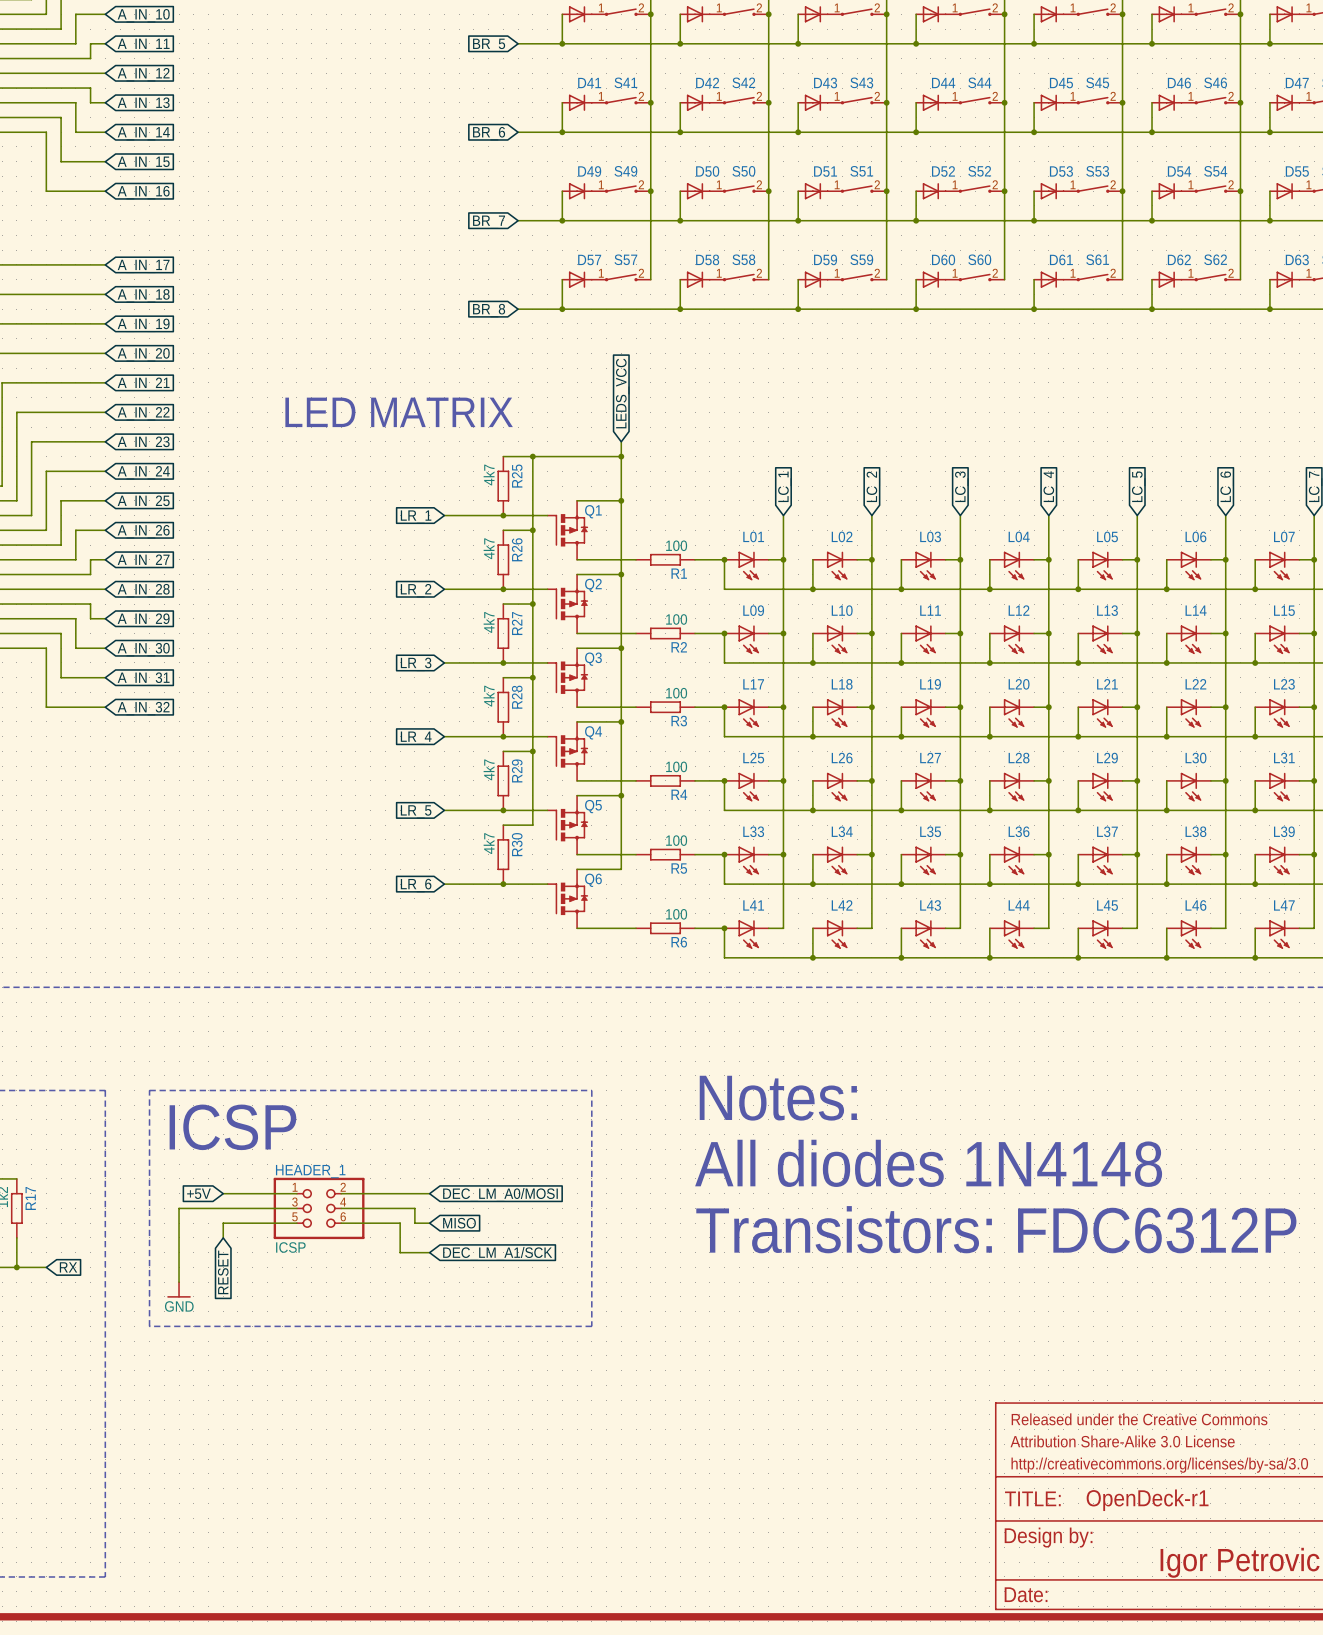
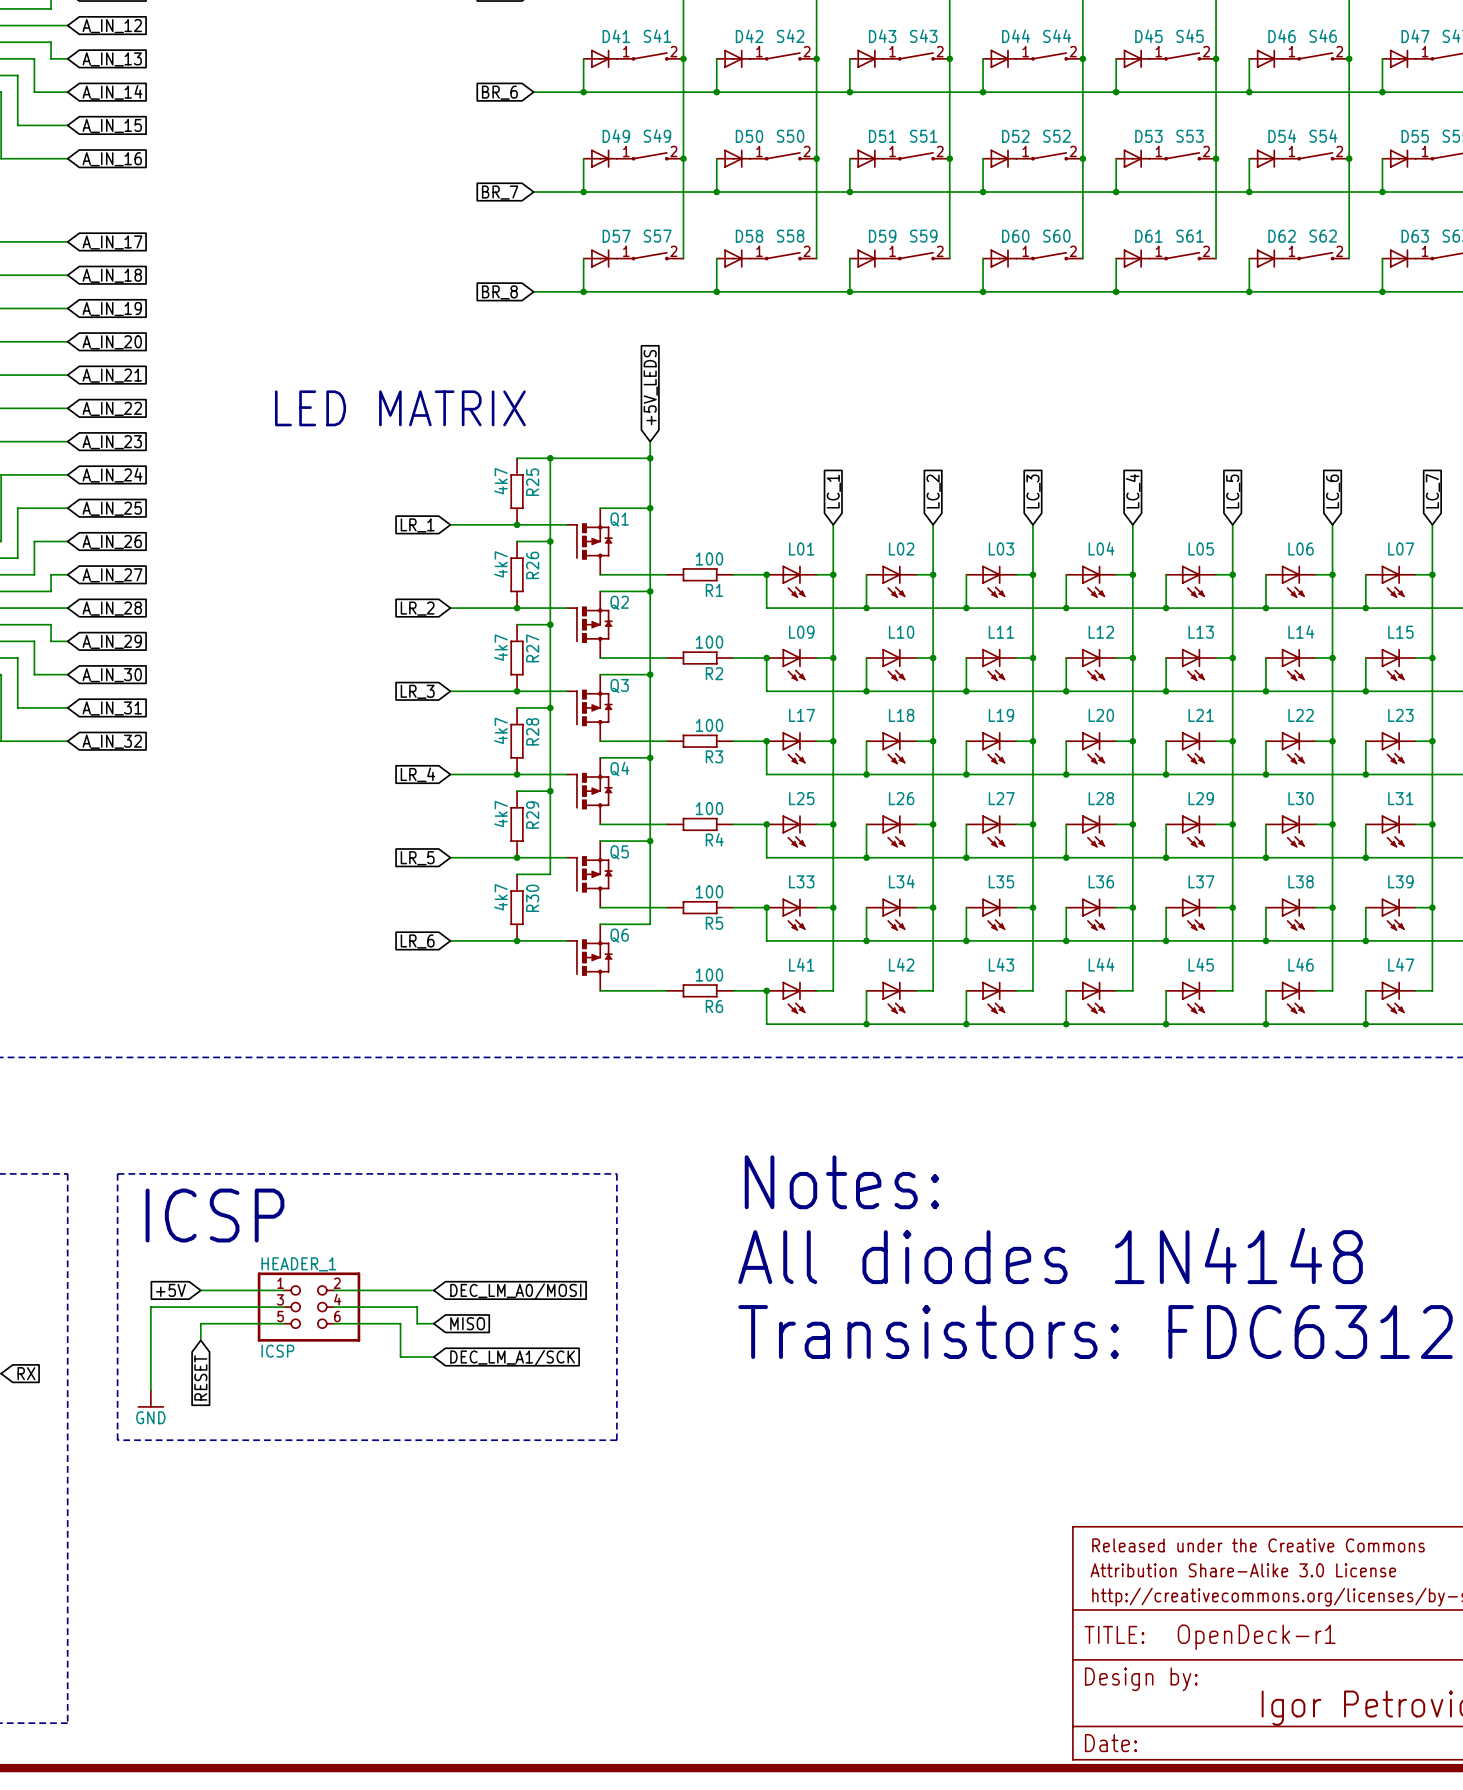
global label: LEDS_VCC (622, 393) -> +5V_LEDS (650, 387)

